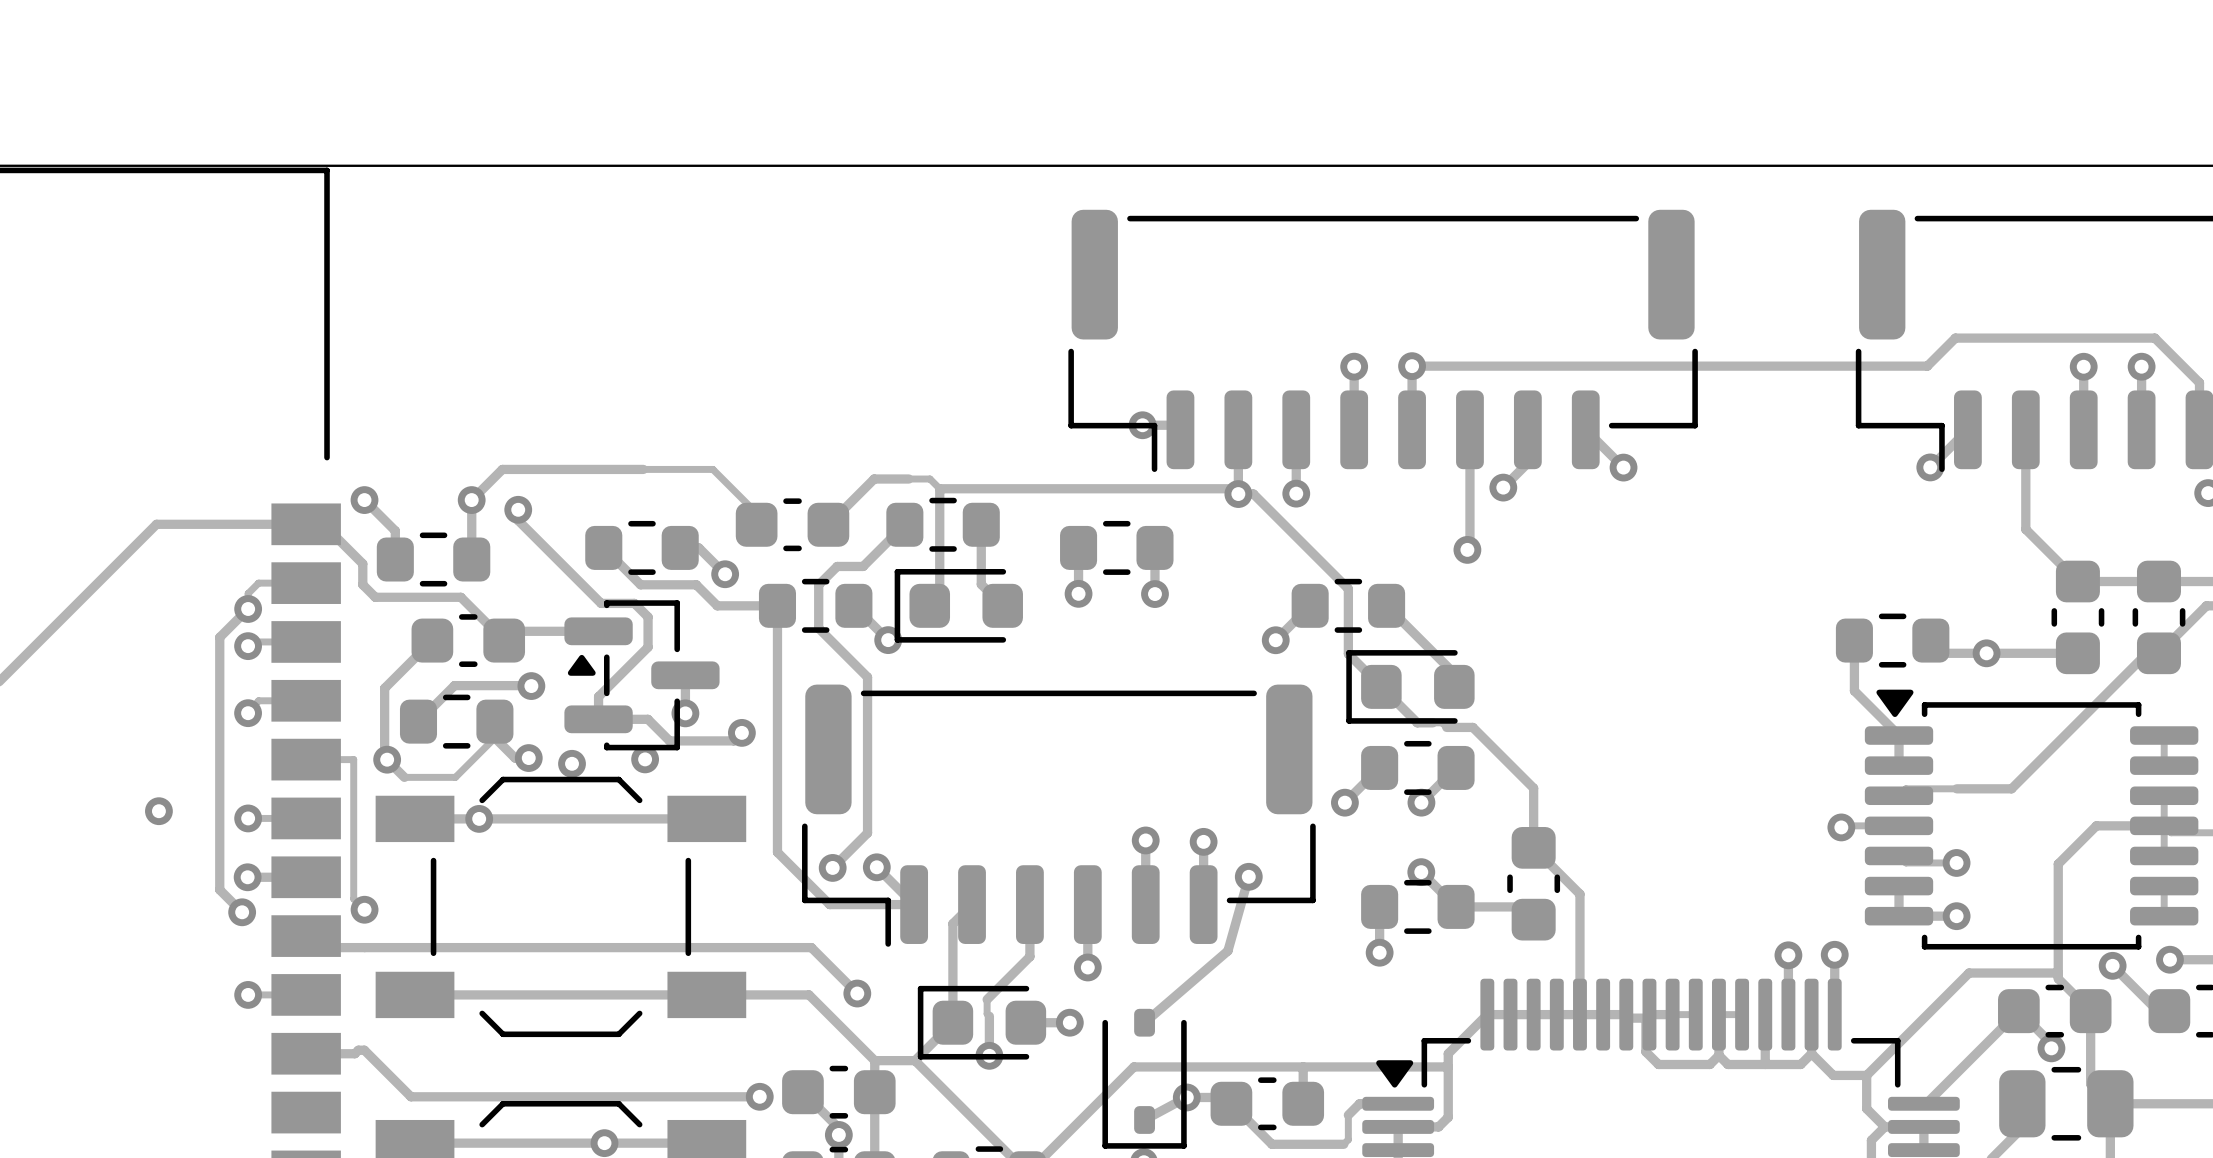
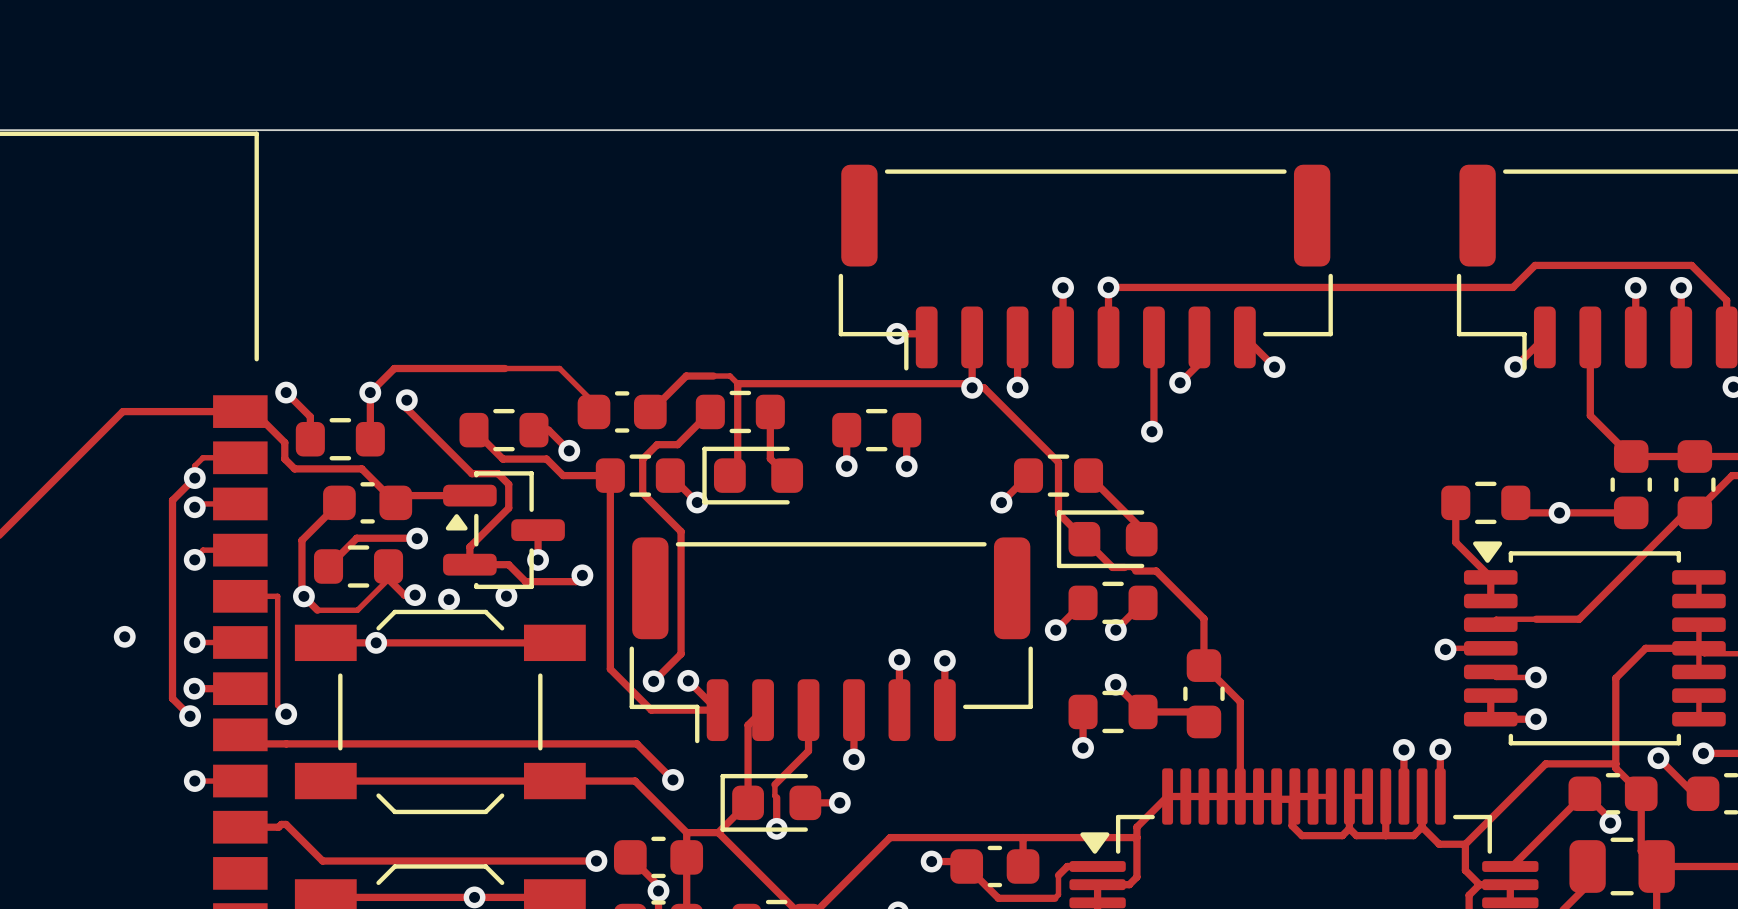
track: (1248, 876) (1227, 950) (1144, 1022) -> none
via: (1248, 876) -> none
part: (1144, 1078) -> none
track: (1174, 1103) (1144, 1119) -> none

